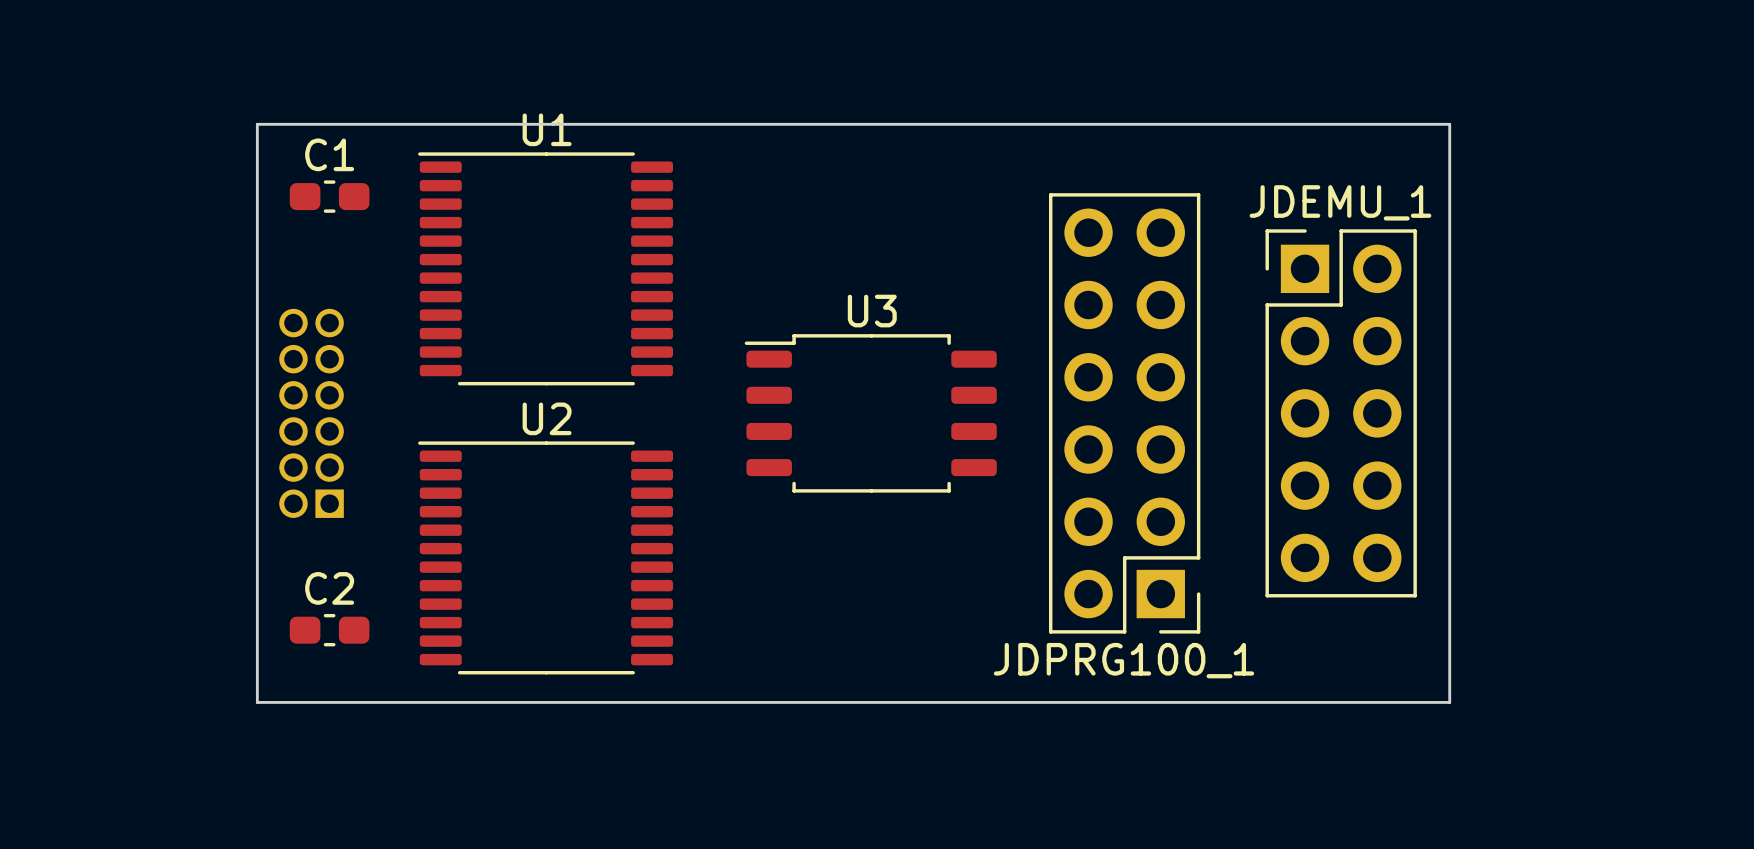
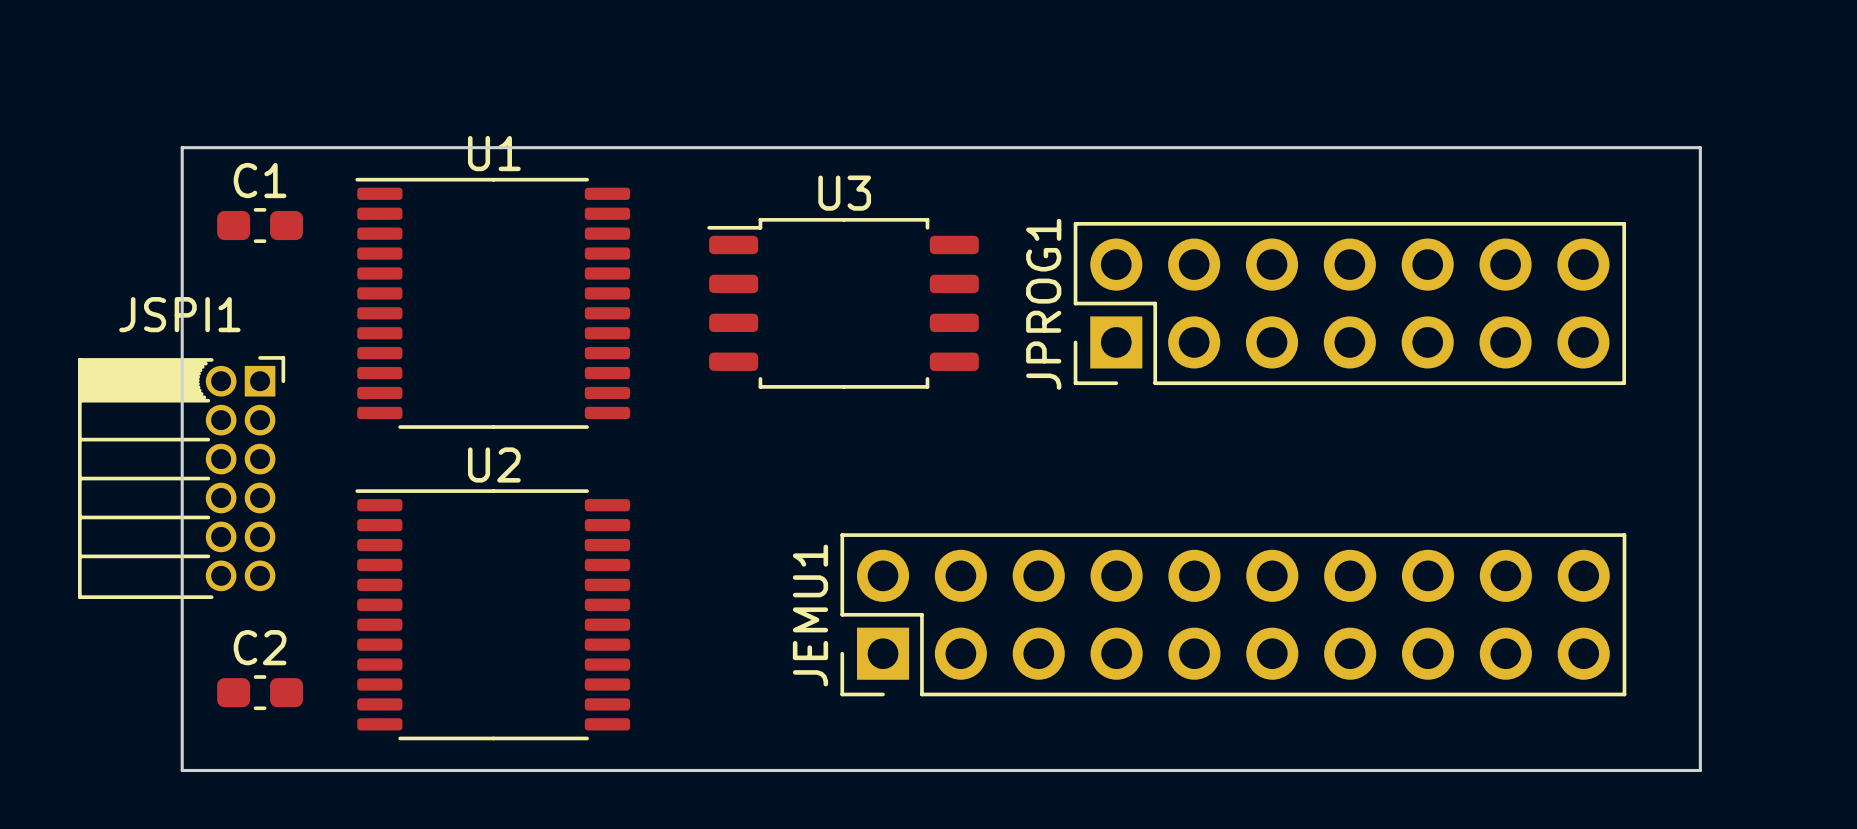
board edge: (1449, 124) (1449, 702) -> (1466, 147) (1700, 147) (1700, 770) (1466, 770)
JPROG1: none -> (1349, 303)
JSPI1 side: bottom (311, 413) -> top (181, 477)
U3 position: (870, 413) -> (843, 303)
JDPRG100_1: (1124, 413) -> none
JDEMU_1: (1341, 413) -> none
JEMU1: none -> (1233, 614)

